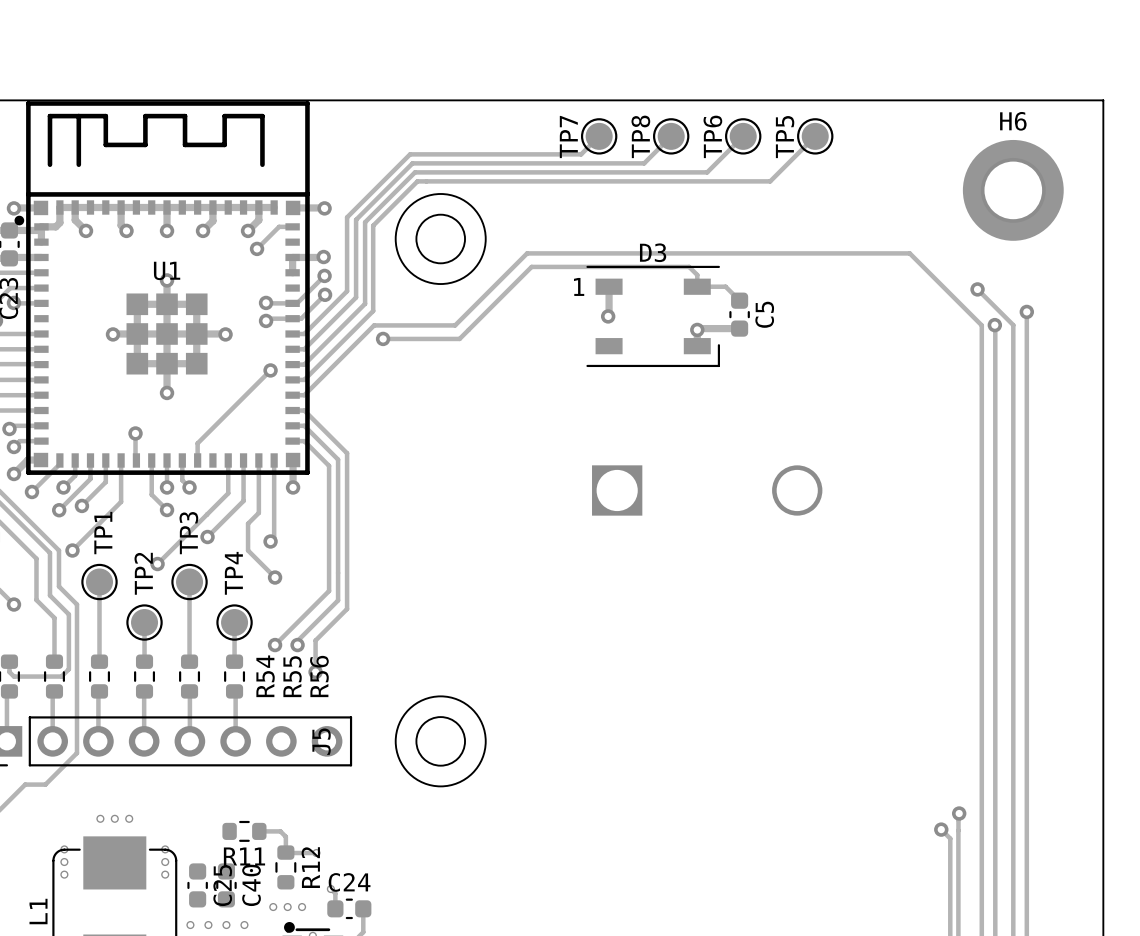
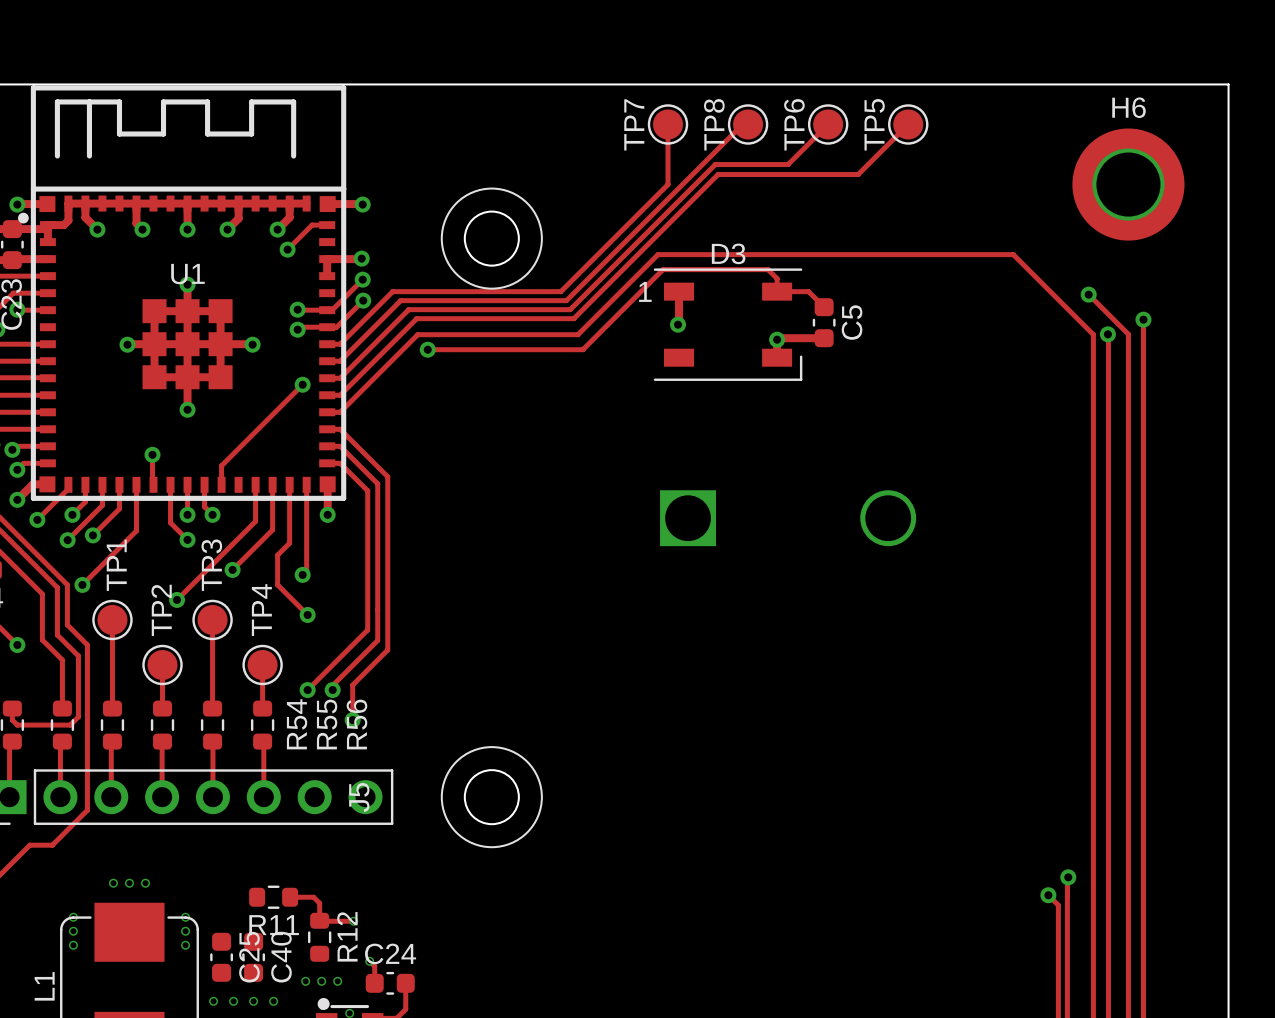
track: (599, 136) (581, 154) (410, 154) (347, 217) (347, 291) -> (668, 124) (668, 184) (560, 291) (392, 291) (387, 296)
track: (671, 136) (644, 163) (412, 163) (356, 219) (356, 297) -> (748, 124) (742, 124) (566, 300) (400, 300) (397, 303)
track: (641, 172) (415, 172) (365, 222) (365, 303) -> (715, 164) (570, 309) (407, 310)
track: (644, 181) (417, 181) (373, 225) (373, 311) -> (718, 174) (573, 318) (416, 318)
track: (590, 253) (527, 253) (455, 325) -> (658, 254) (577, 334) (507, 334)
track: (594, 266) (531, 266) (459, 338) -> (663, 269) (582, 349) (512, 349)

